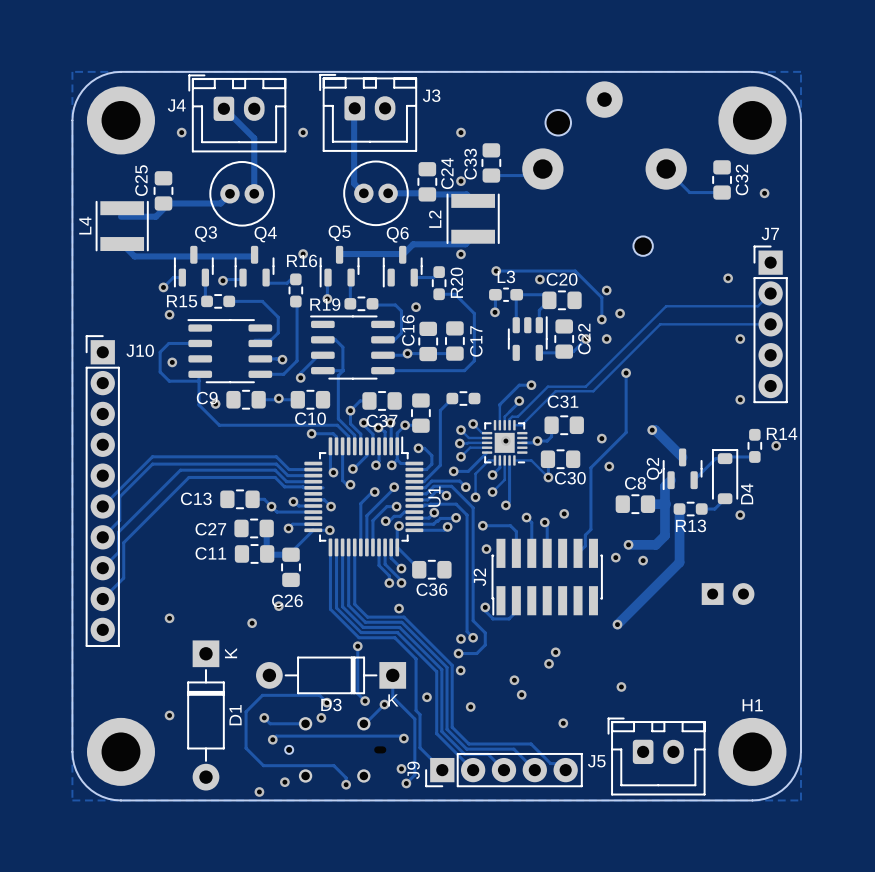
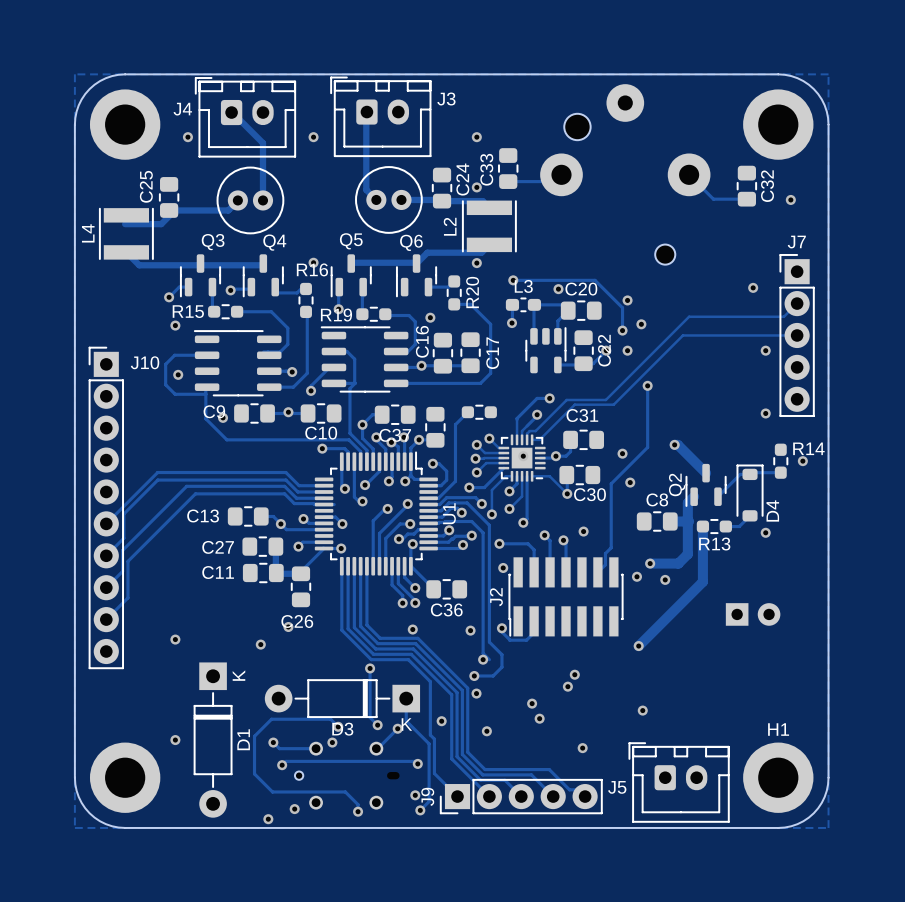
via: none -> (470, 630)
via: none -> (483, 659)
via: (473, 637) -> none
via: (460, 638) -> none

